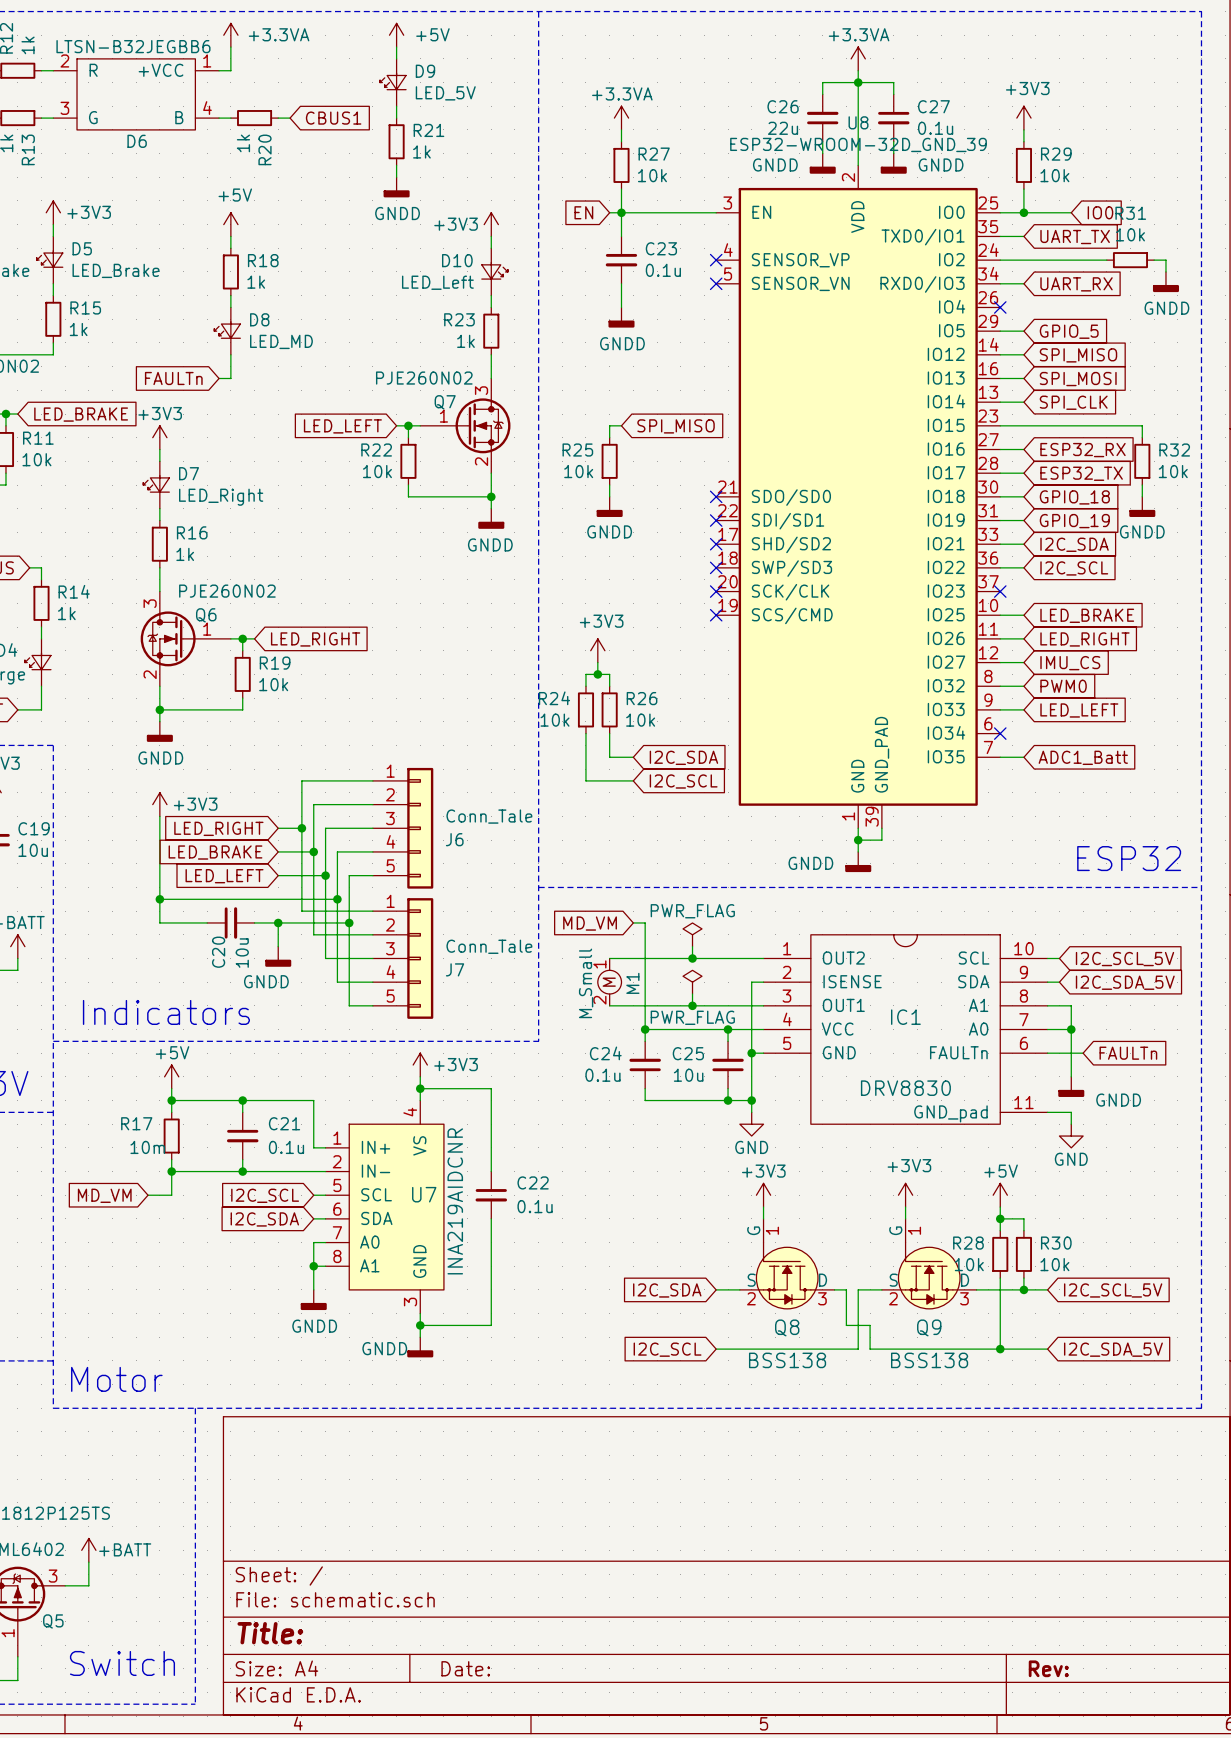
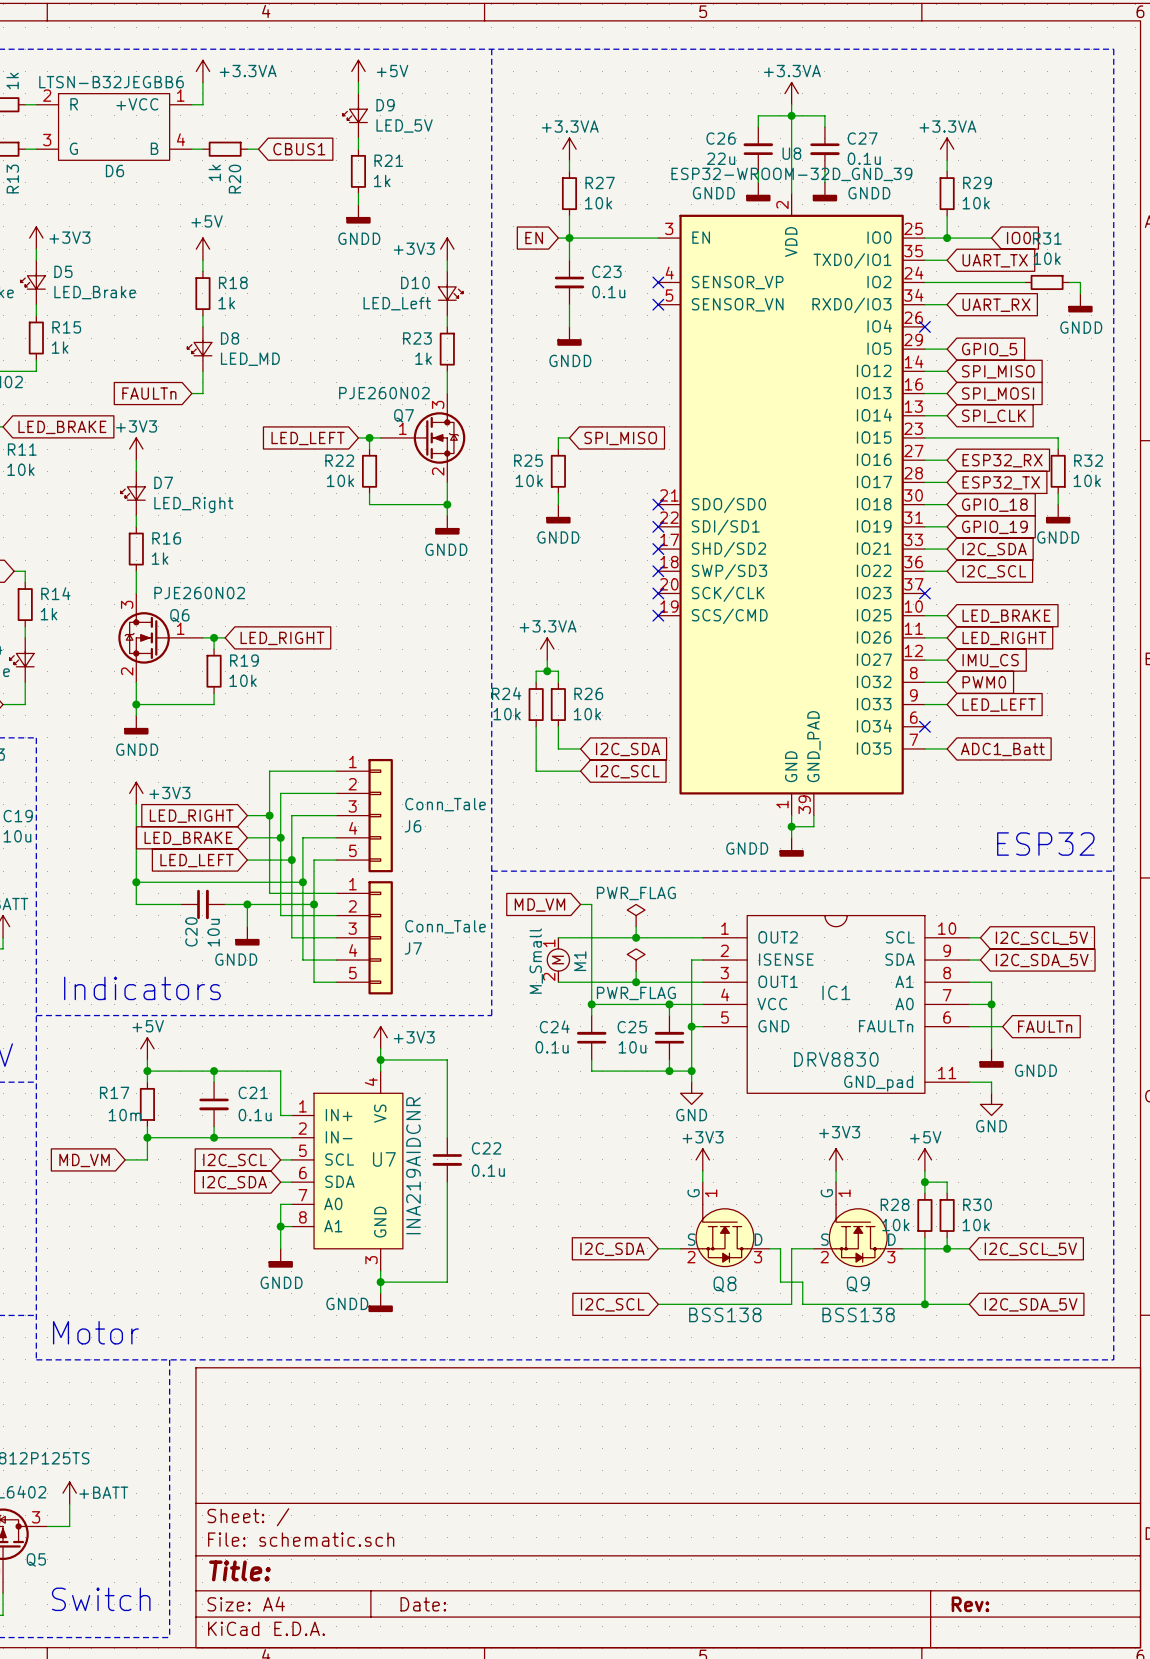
power symbol: +3V3 (1023, 118) -> +3.3VA (947, 149)
power symbol: +3V3 (597, 650) -> +3.3VA (547, 649)

